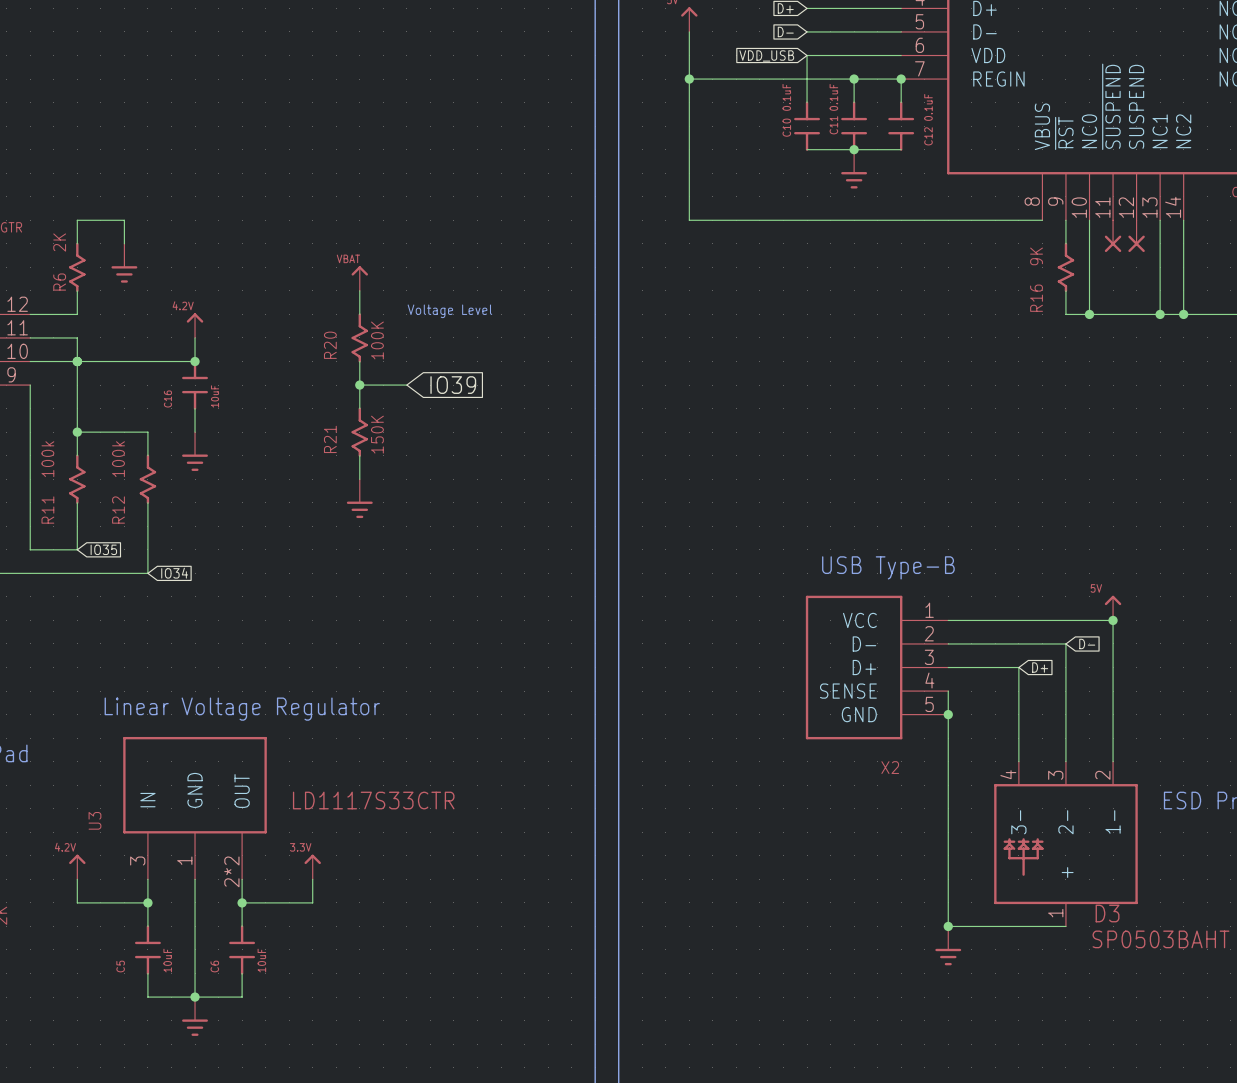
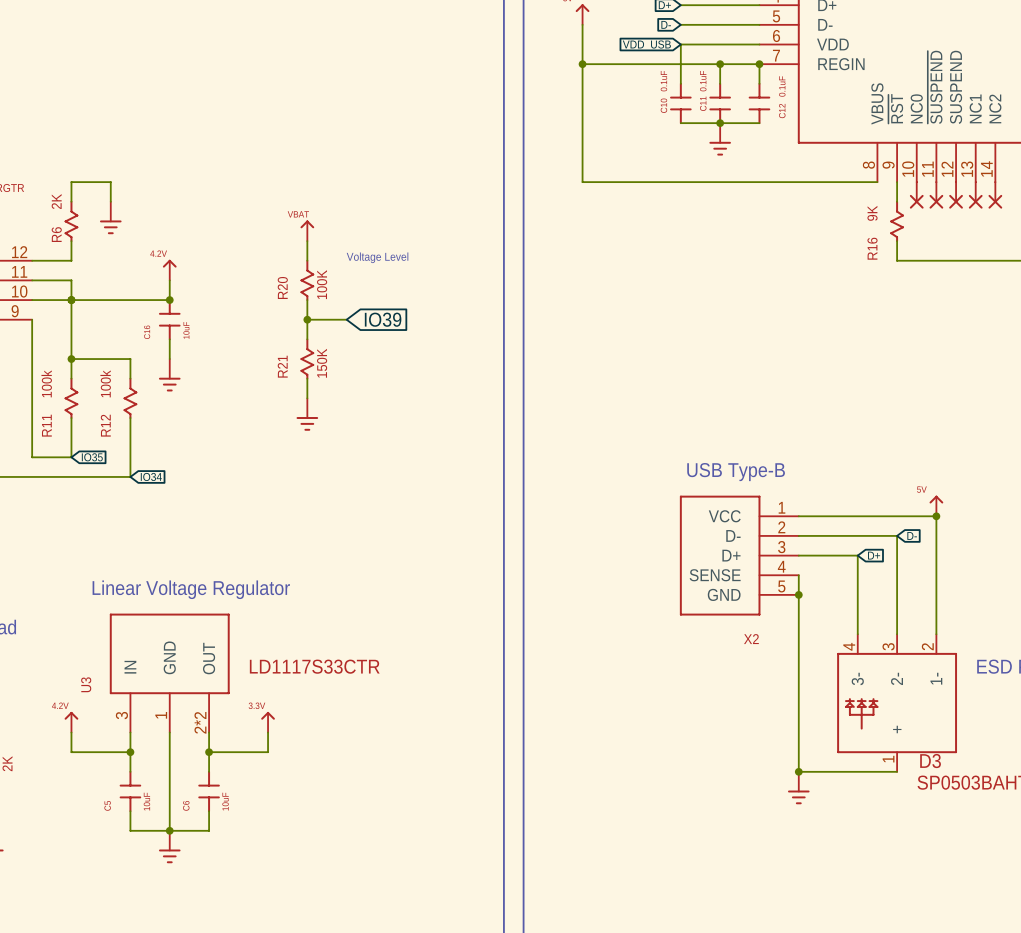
wire: (1089, 220) (1089, 314) -> none
wire: (1160, 220) (1160, 314) -> none
wire: (1183, 220) (1183, 314) -> none
part: none -> (916, 195)
part: none -> (975, 195)
part: none -> (995, 195)
junction: (1089, 314) -> none
junction: (1160, 314) -> none
junction: (1183, 314) -> none

